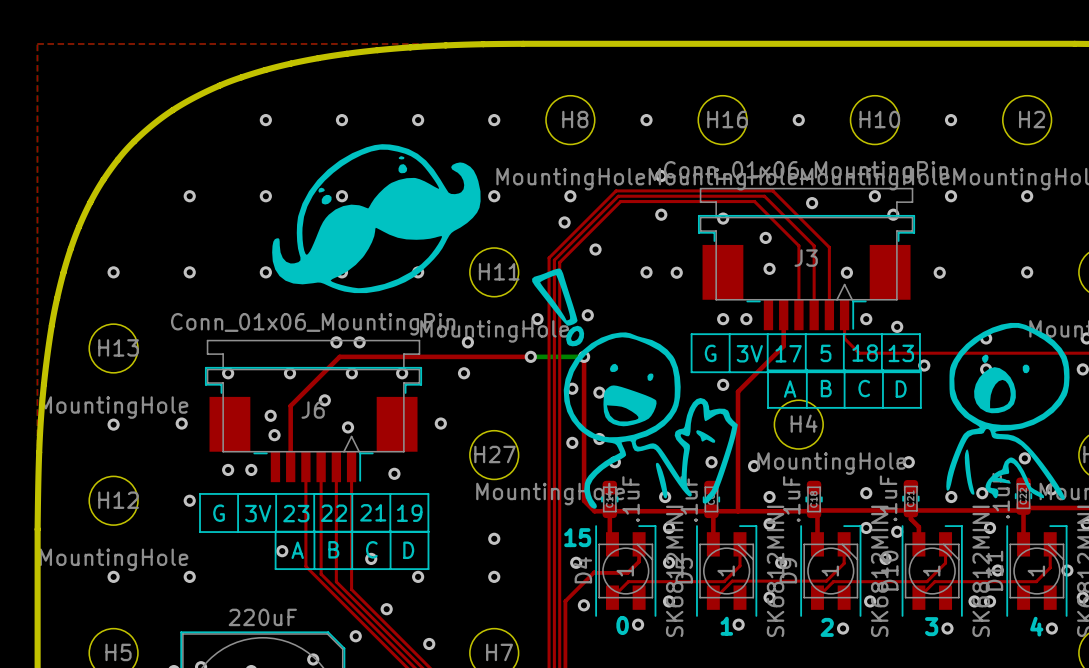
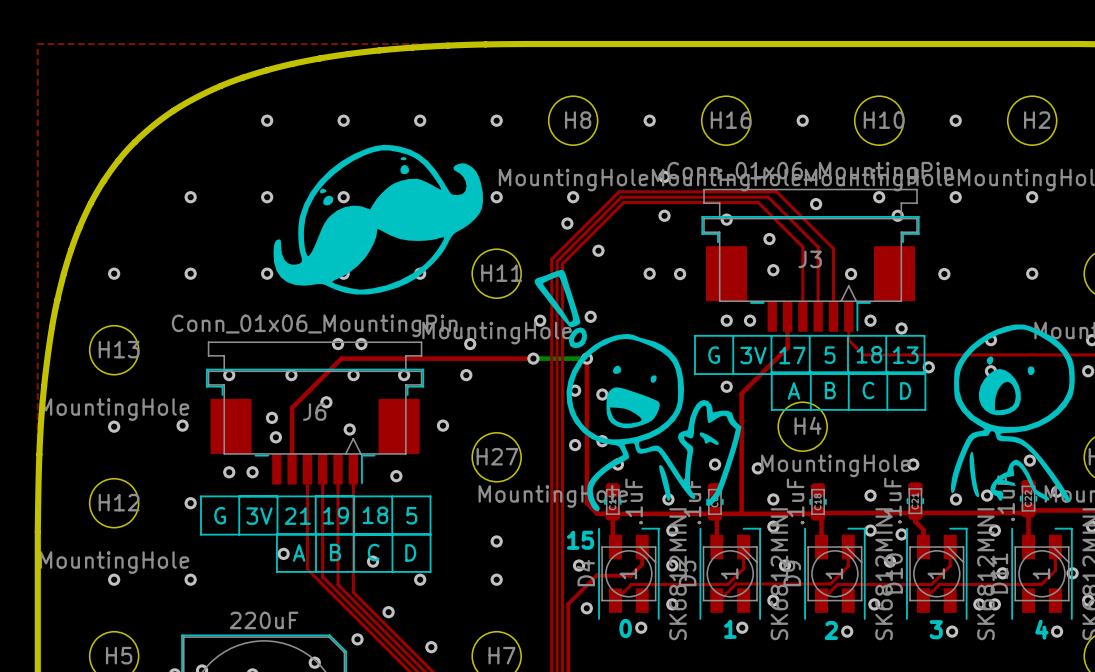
text: 21 (373, 512) -> 18 (375, 515)
text: 23 (296, 513) -> 21 (297, 516)
text: 22 (334, 513) -> 19 (336, 515)
text: 19 (409, 513) -> 5 (411, 515)

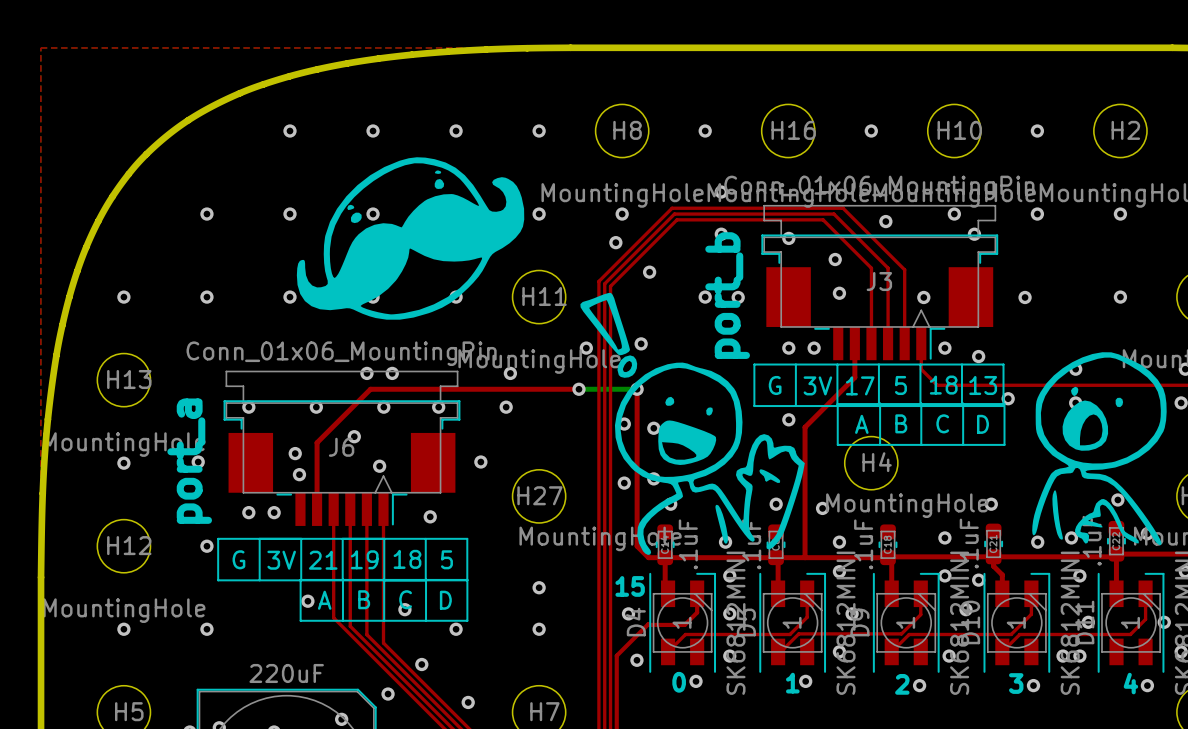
text: none -> port_b (727, 295)
text: none -> port_a (189, 461)

